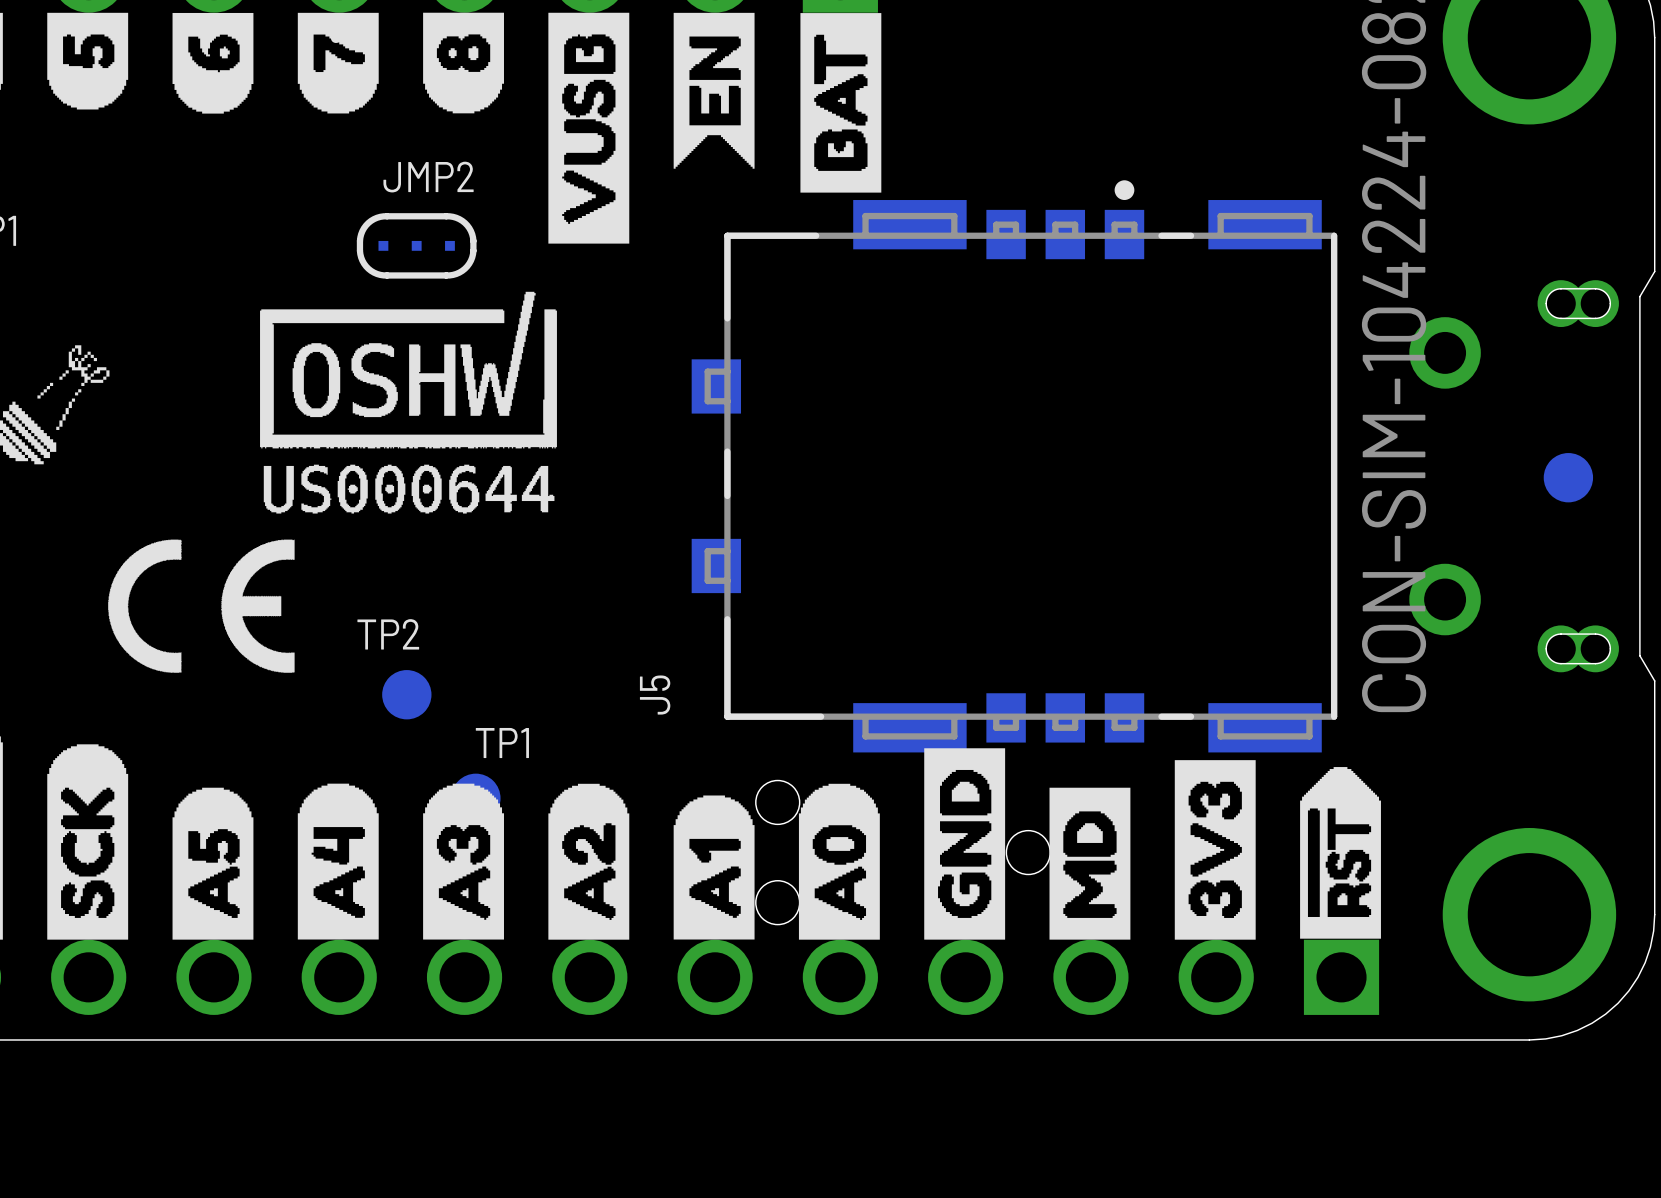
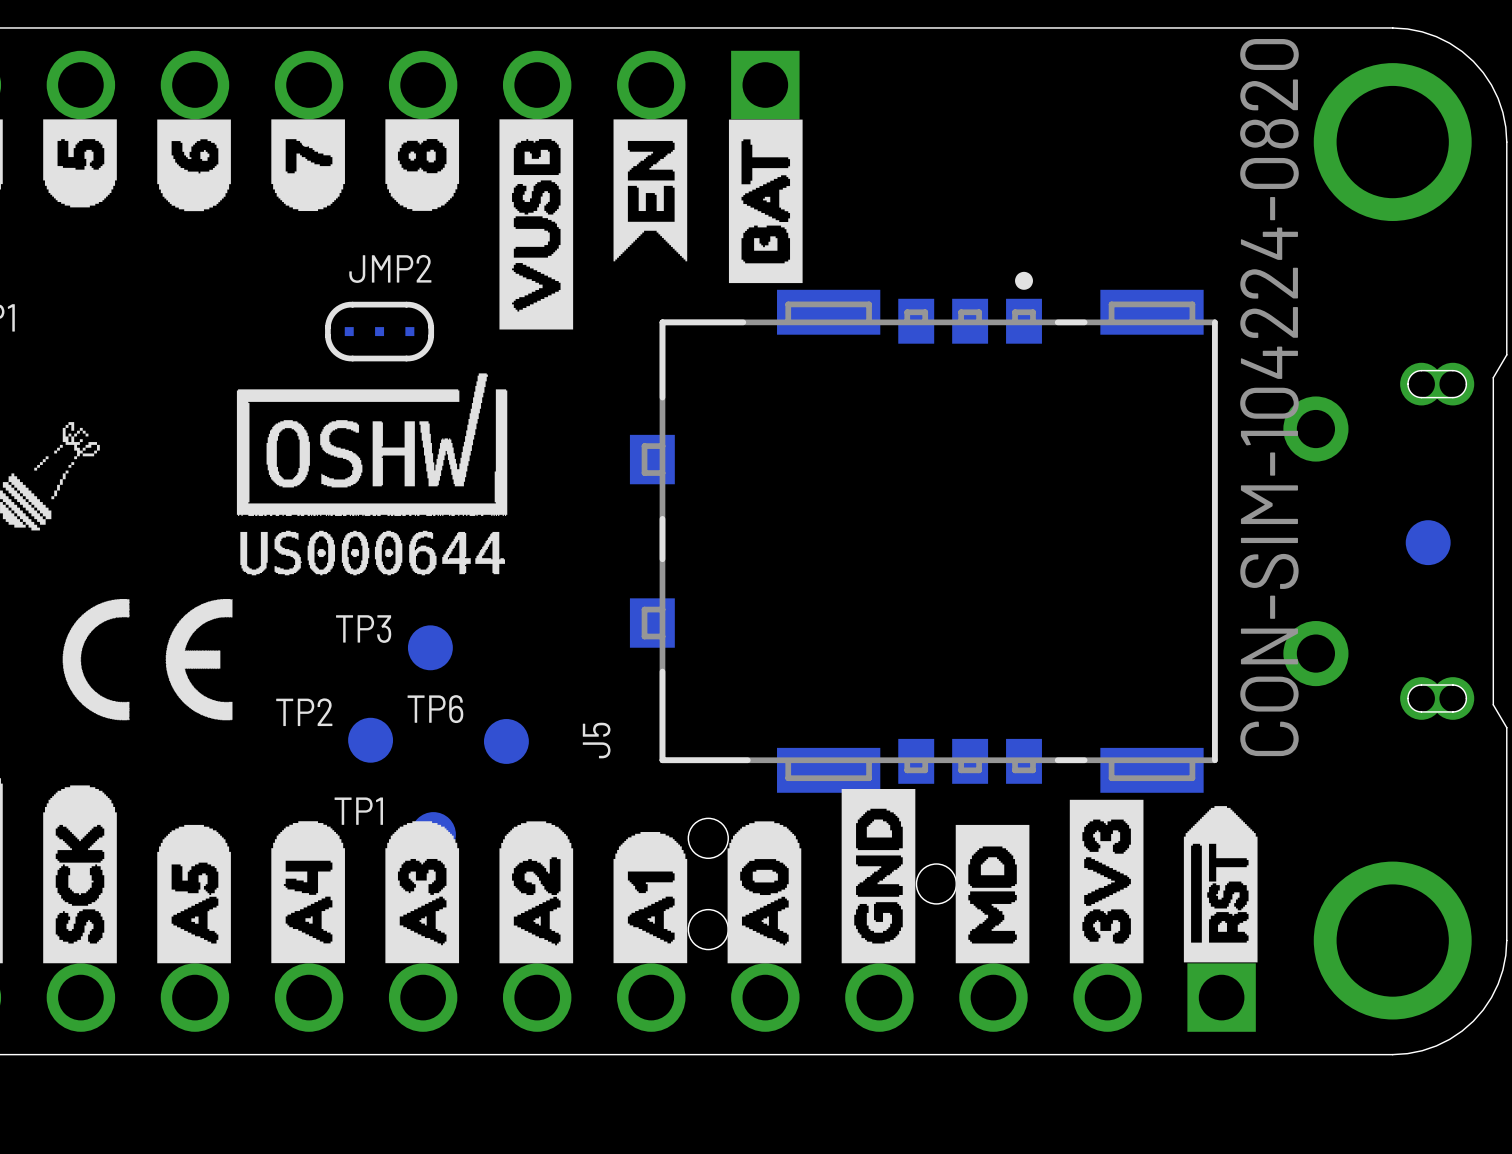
TP3: none -> (430, 647)
drawing position: (201, 606) -> (147, 659)
TP2 name position: TP2 (388, 634) -> TP2 (304, 712)
TP6: none -> (506, 741)
TP1 name position: TP1 (502, 743) -> TP1 (358, 811)

